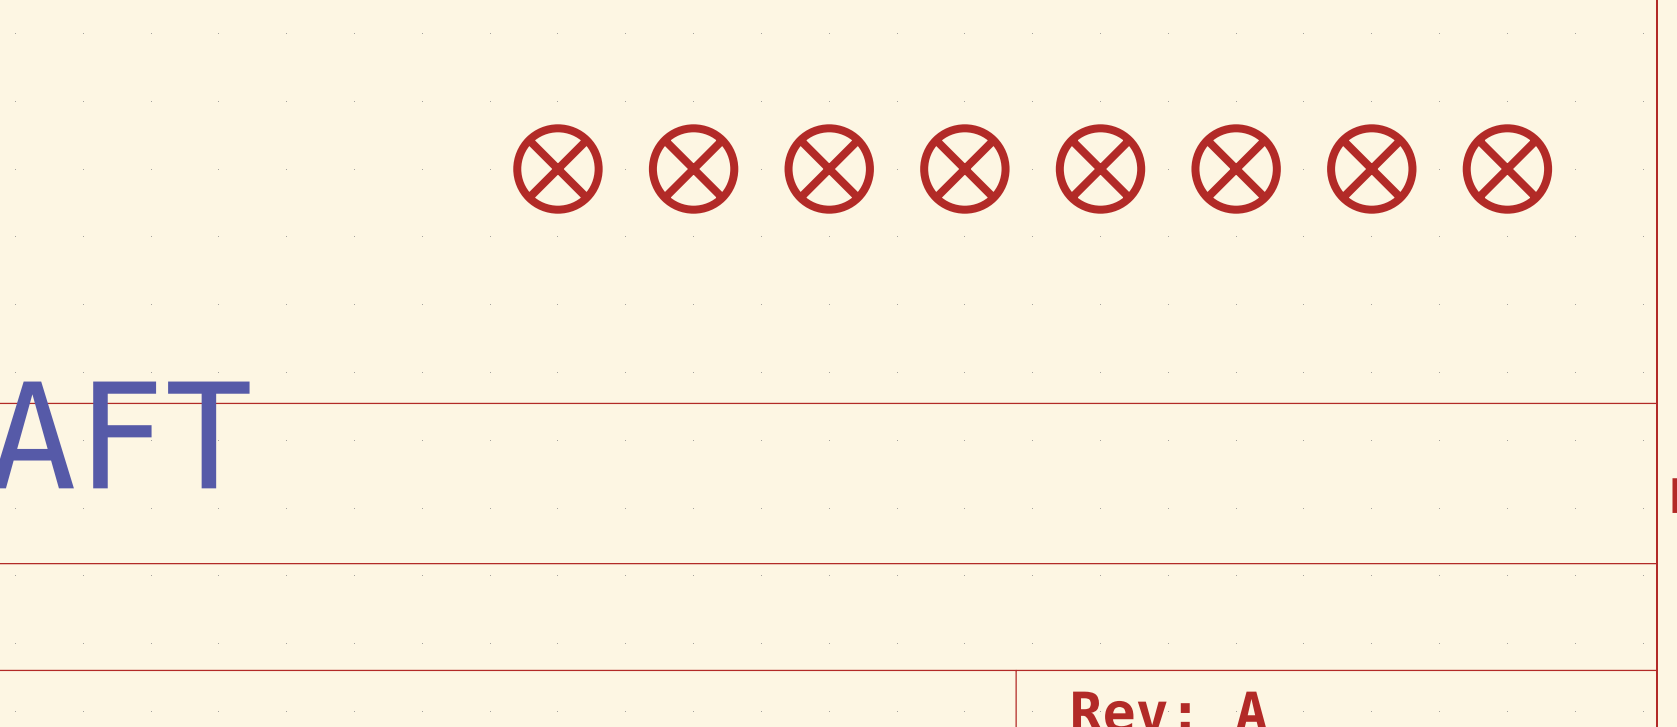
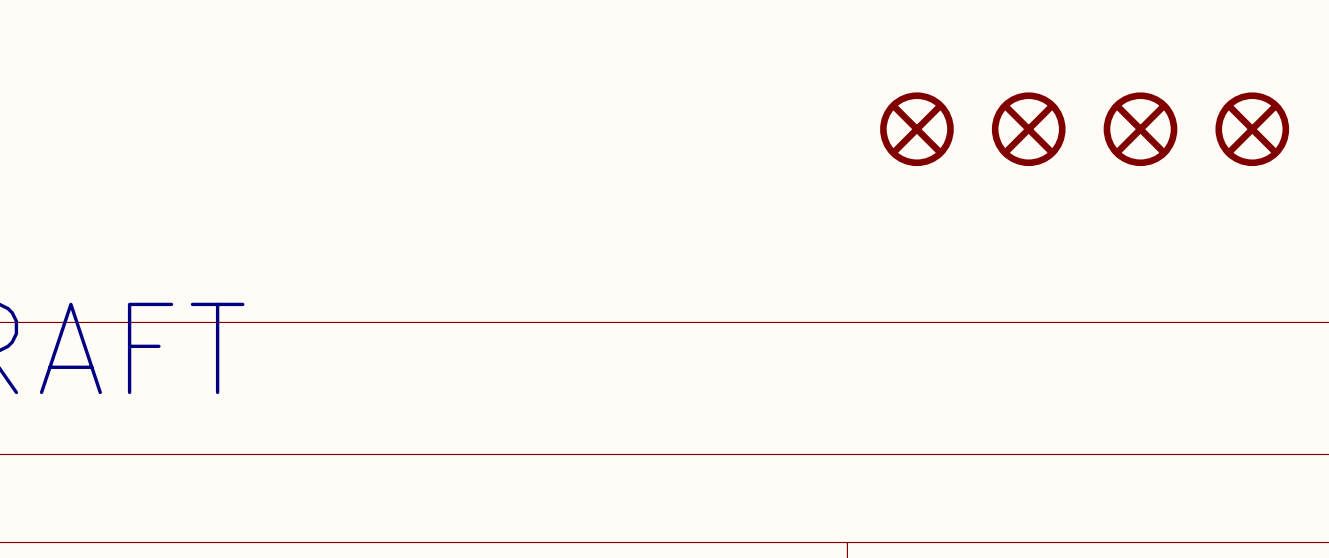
part: (557, 169) -> none
part: (693, 169) -> none
part: (829, 169) -> none
part: (964, 169) -> none

